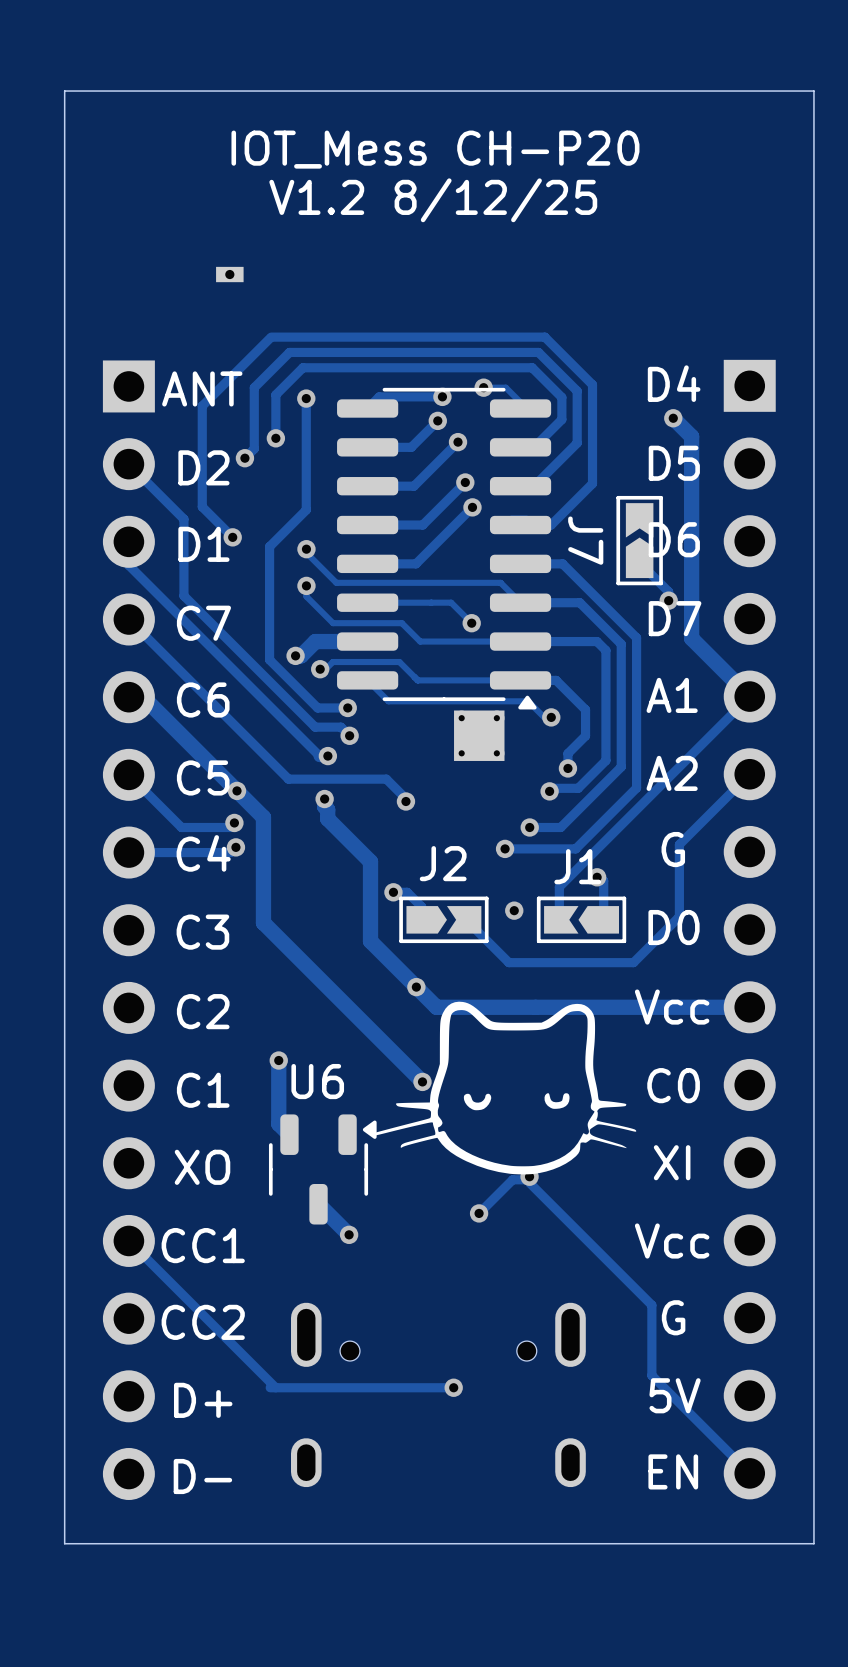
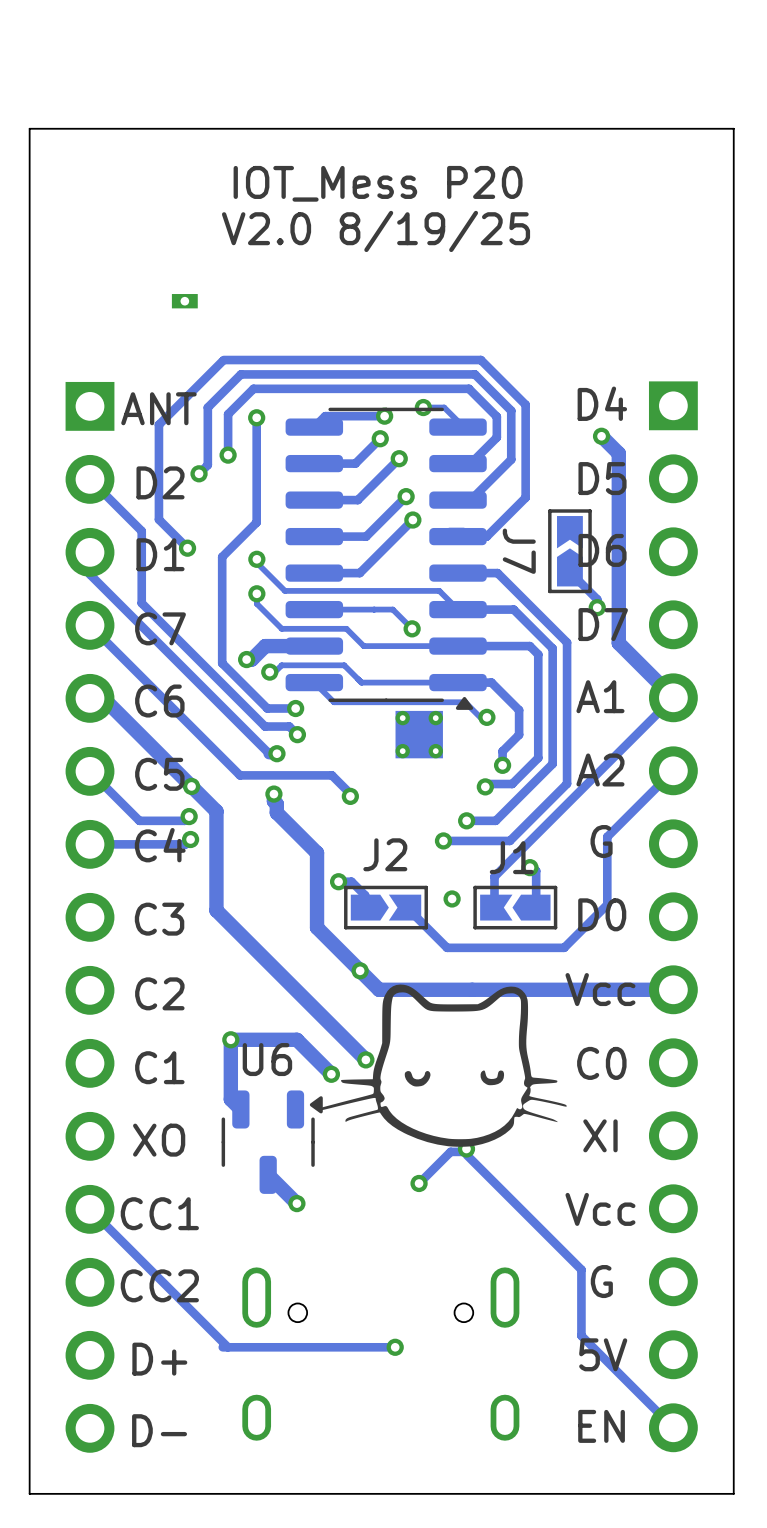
text: IOT_Mess CH-P20 (435, 149) -> IOT_Mess P20 (378, 183)
text: V1.2 8/12/25 (433, 200) -> V2.0 8/19/25 (376, 231)
track: none -> (230, 1039) (296, 1039) (331, 1074)
via: none -> (331, 1074)

